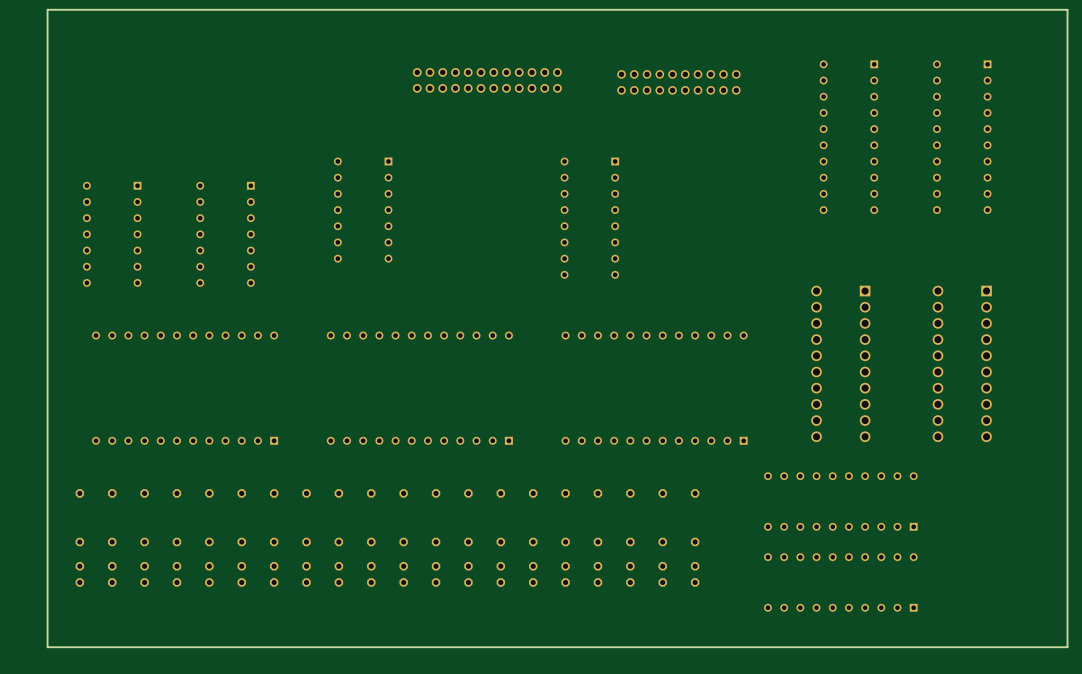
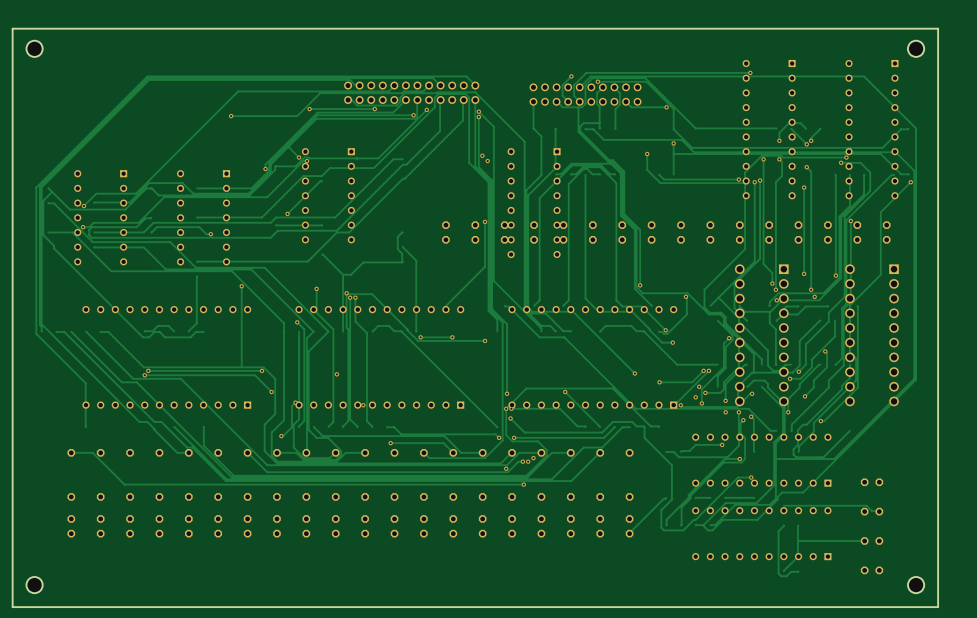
board edge: (1067, 9) (47, 9) (47, 647) (1067, 647) (1067, 9) -> (938, 28) (12, 28) (12, 607) (938, 607) (938, 28)
part: none -> (34, 48)
part: none -> (916, 48)
track: none -> (750, 72) (586, 72) (574, 85) (574, 95) (579, 101)
via: none -> (750, 72)
track: none -> (571, 76) (562, 85) (562, 95) (568, 101)
via: none -> (571, 76)
part position: (487, 80) -> (411, 92)
part position: (678, 82) -> (585, 94)
track: none -> (597, 81) (646, 81) (673, 109) (673, 129) (692, 147) (882, 147) (901, 129) (908, 128)
via: none -> (597, 81)
track: none -> (359, 85) (355, 85) (350, 79) (149, 79) (41, 187) (41, 324) (139, 421) (147, 421) (177, 452) (188, 452)
track: none -> (394, 85) (388, 91) (238, 91) (135, 193) (96, 193) (83, 206)
track: none -> (429, 85) (423, 91) (403, 91) (402, 93) (320, 93) (297, 116) (231, 116)
track: none -> (440, 85) (433, 78) (148, 78) (39, 186) (39, 325) (41, 331)
track: none -> (475, 85) (466, 76) (147, 76) (36, 187) (36, 333) (85, 383) (85, 427)
track: none -> (579, 87) (590, 76) (864, 76) (916, 128) (916, 379) (803, 492) (782, 492) (757, 519) (723, 519) (712, 530) (708, 530) (702, 525)
track: none -> (602, 87) (596, 93) (600, 128)
track: none -> (614, 87) (619, 93) (619, 104) (615, 109) (614, 128)
track: none -> (348, 100) (351, 100) (357, 105) (396, 105) (404, 93) (475, 92) (524, 141) (524, 309) (541, 325) (550, 325) (556, 331)
track: none -> (405, 100) (393, 112) (317, 112) (265, 164) (265, 169)
track: none -> (417, 100) (417, 116) (415, 118) (316, 118) (270, 164) (270, 171) (248, 193) (193, 193) (182, 183) (149, 183) (129, 202) (94, 203)
track: none -> (440, 100) (440, 131) (406, 164) (403, 164) (336, 230) (277, 230) (270, 237) (91, 237) (89, 235) (89, 229) (91, 227) (136, 227) (145, 218) (151, 217)
track: none -> (463, 100) (462, 120) (349, 232) (336, 232) (307, 261) (197, 261)
track: none -> (475, 100) (475, 166) (490, 181) (490, 310) (502, 322) (502, 440) (485, 458) (429, 458) (423, 452)
track: none -> (533, 101) (533, 128) (541, 136) (541, 175) (526, 190) (526, 308) (531, 313) (545, 313) (563, 331) (570, 331)
track: none -> (556, 101) (562, 107) (581, 107) (585, 103) (585, 85) (592, 78) (645, 78) (695, 128) (776, 128)
track: none -> (626, 101) (631, 107) (666, 107)
track: none -> (578, 107) (578, 131) (608, 161) (611, 161) (622, 172) (622, 214) (636, 228) (636, 287) (642, 293) (687, 293) (708, 314) (720, 314) (723, 317) (723, 324) (753, 354) (753, 372)
via: none -> (666, 107)
via: none -> (309, 109)
track: none -> (374, 109) (309, 109)
via: none -> (374, 109)
track: none -> (426, 109) (378, 158) (304, 157) (295, 166) (275, 166) (275, 169) (249, 195) (158, 195) (151, 188) (146, 188) (125, 209) (69, 209) (48, 188)
via: none -> (426, 109)
track: none -> (478, 111) (493, 126) (493, 280) (541, 328) (541, 331)
via: none -> (478, 111)
track: none -> (413, 115) (317, 115) (269, 163) (269, 170) (251, 188) (197, 188)
via: none -> (413, 115)
via: none -> (231, 116)
track: none -> (478, 116) (478, 167) (492, 180) (492, 309) (507, 324) (507, 393)
via: none -> (478, 116)
track: none -> (599, 123) (583, 123) (580, 126) (580, 131) (609, 160) (612, 160) (624, 171) (624, 213) (640, 229) (640, 285)
track: none -> (556, 128) (555, 168) (528, 195) (528, 307) (532, 311) (573, 311) (634, 373)
track: none -> (585, 128) (593, 129) (604, 139) (681, 139) (693, 152) (895, 152) (914, 170) (914, 378) (834, 459) (775, 459)
track: none -> (791, 128) (806, 144)
track: none -> (805, 128) (800, 123) (789, 123) (779, 132) (779, 140)
track: none -> (820, 128) (811, 138) (811, 140)
via: none -> (779, 140)
via: none -> (811, 140)
track: none -> (673, 143) (673, 174)
via: none -> (673, 143)
via: none -> (806, 144)
track: none -> (288, 146) (299, 157)
track: none -> (647, 154) (647, 169) (660, 183) (745, 183)
via: none -> (647, 154)
track: none -> (673, 154) (880, 154) (901, 174) (908, 174)
via: none -> (482, 155)
via: none -> (299, 157)
track: none -> (846, 157) (761, 155) (745, 172) (745, 249) (704, 289) (704, 307) (709, 312) (721, 312) (725, 317) (725, 323) (761, 359) (761, 364)
via: none -> (846, 157)
track: none -> (402, 159) (393, 159) (335, 217) (276, 217) (270, 222) (153, 222) (143, 232) (94, 232)
track: none -> (763, 159) (763, 264) (772, 273) (772, 283)
via: none -> (763, 159)
track: none -> (779, 159) (782, 161) (782, 176) (775, 182) (775, 289)
via: none -> (779, 159)
track: none -> (306, 161) (303, 161) (267, 197) (164, 197) (138, 222) (93, 222) (89, 227) (83, 227)
via: none -> (306, 161)
via: none -> (487, 161)
track: none -> (841, 162) (860, 162) (870, 172) (870, 191) (844, 216) (844, 296) (828, 312) (828, 321) (805, 344) (805, 364) (798, 371)
via: none -> (841, 162)
track: none -> (806, 167) (811, 171) (811, 289)
via: none -> (806, 167)
via: none -> (265, 169)
track: none -> (556, 174) (560, 174) (571, 163) (611, 163) (620, 173) (620, 215) (634, 229) (634, 288) (651, 305)
track: none -> (570, 174) (575, 174) (582, 167) (600, 167) (616, 183) (616, 300) (622, 306) (641, 306) (665, 330)
track: none -> (585, 174) (585, 298) (598, 311) (632, 311) (662, 342) (672, 342)
track: none -> (600, 174) (592, 174) (587, 169) (583, 169) (568, 183) (568, 300) (563, 305)
track: none -> (614, 174) (610, 174) (601, 165) (572, 165) (539, 198) (539, 300) (534, 305)
track: none -> (658, 174) (663, 179) (738, 179)
track: none -> (835, 174) (835, 275)
track: none -> (849, 174) (849, 206) (839, 216) (839, 277) (823, 293) (778, 293) (769, 302) (769, 305)
track: none -> (864, 174) (864, 194) (841, 217) (841, 278) (819, 300) (782, 300) (770, 311) (745, 311) (739, 305)
track: none -> (894, 174) (846, 220) (846, 303) (842, 308) (842, 358) (835, 364)
via: none -> (738, 179)
track: none -> (321, 181) (287, 213)
track: none -> (760, 180) (760, 258) (734, 284) (734, 308) (747, 320)
via: none -> (760, 180)
track: none -> (754, 182) (754, 261) (710, 305)
via: none -> (754, 182)
track: none -> (910, 182) (880, 212) (880, 274) (849, 305) (849, 352) (856, 358) (856, 380) (813, 422) (813, 431) (798, 446) (798, 451)
via: none -> (910, 182)
track: none -> (804, 187) (804, 273)
via: none -> (804, 187)
track: none -> (52, 191) (43, 200) (43, 235) (53, 245) (53, 248) (142, 337) (149, 337) (154, 332) (159, 331) (165, 337) (190, 337) (195, 332) (203, 331)
track: none -> (48, 203) (53, 203) (92, 242) (170, 242) (195, 267) (264, 267) (328, 331) (308, 351) (308, 429) (316, 437) (328, 437) (341, 451) (341, 454) (336, 459) (303, 459) (296, 452) (276, 452)
via: none -> (83, 206)
via: none -> (287, 213)
track: none -> (197, 217) (262, 217) (303, 176) (321, 176) (329, 168) (373, 168) (434, 107) (434, 97) (438, 94) (465, 94) (469, 97) (469, 162) (488, 182) (488, 310) (497, 319) (497, 331)
track: none -> (850, 221) (850, 302) (843, 309) (843, 365) (828, 380) (828, 387) (791, 424) (791, 430)
via: none -> (850, 221)
track: none -> (485, 221) (485, 266) (445, 305)
via: none -> (485, 221)
track: none -> (321, 225) (276, 225)
via: none -> (83, 227)
track: none -> (48, 232) (72, 232) (111, 271) (232, 271) (284, 323) (284, 420) (271, 432) (271, 455) (277, 461) (336, 461) (345, 452) (365, 452)
track: none -> (151, 232) (157, 227) (199, 227) (206, 234) (210, 234)
track: none -> (402, 232) (397, 236) (397, 249) (402, 253) (402, 262) (363, 262) (351, 274) (343, 274)
part: none -> (445, 232)
part: none -> (475, 232)
part: none -> (504, 232)
part: none -> (534, 232)
part: none -> (563, 232)
part: none -> (592, 232)
part: none -> (622, 232)
part: none -> (651, 232)
part: none -> (681, 232)
part: none -> (710, 232)
part: none -> (739, 232)
part: none -> (769, 232)
part: none -> (798, 232)
part: none -> (827, 232)
part: none -> (857, 232)
part: none -> (886, 232)
via: none -> (210, 234)
track: none -> (94, 247) (143, 247) (165, 269) (251, 269) (313, 331) (306, 338) (306, 452)
track: none -> (402, 247) (416, 260) (416, 331)
track: none -> (321, 254) (343, 274)
via: none -> (804, 273)
track: none -> (343, 274) (343, 331)
via: none -> (835, 275)
track: none -> (197, 276) (196, 323) (188, 331)
via: none -> (772, 283)
via: none -> (640, 285)
track: none -> (241, 286) (241, 367)
via: none -> (241, 286)
track: none -> (316, 288) (316, 312) (333, 329) (333, 421) (328, 427)
via: none -> (316, 288)
via: none -> (775, 289)
via: none -> (811, 289)
track: none -> (346, 293) (348, 421) (343, 427)
via: none -> (346, 293)
track: none -> (346, 294) (372, 294) (418, 340) (485, 340)
track: none -> (686, 296) (686, 314) (667, 333) (658, 331)
via: none -> (686, 296)
via: none -> (814, 296)
track: none -> (350, 297) (350, 419) (357, 427)
via: none -> (350, 297)
track: none -> (355, 297) (355, 321) (366, 332) (366, 421) (372, 427)
via: none -> (355, 297)
track: none -> (718, 297) (767, 350) (767, 365) (773, 370) (779, 370) (785, 364) (791, 364)
via: none -> (776, 300)
track: none -> (504, 305) (508, 306) (539, 337) (564, 337) (635, 408) (748, 408) (770, 430) (776, 430)
track: none -> (798, 305) (786, 306) (782, 310)
track: none -> (827, 305) (805, 306) (797, 314) (782, 314) (776, 320)
track: none -> (857, 305) (857, 387) (824, 421) (820, 421)
track: none -> (769, 311) (769, 323) (775, 329) (776, 364)
track: none -> (717, 320) (732, 335) (732, 340) (725, 347) (725, 368) (717, 376) (717, 386)
track: none -> (820, 320) (799, 340) (799, 365) (792, 372) (752, 372) (740, 384) (738, 390) (738, 400)
track: none -> (835, 320) (834, 336) (812, 359) (812, 367) (800, 378) (790, 378)
track: none -> (297, 322) (304, 329) (304, 421) (299, 427)
via: none -> (297, 322)
via: none -> (665, 330)
track: none -> (56, 331) (64, 332) (154, 421) (161, 421) (187, 447) (192, 447) (225, 481) (571, 481) (600, 452)
track: none -> (71, 331) (121, 382) (136, 382) (232, 477) (527, 477) (552, 452) (570, 452)
track: none -> (85, 331) (133, 378) (180, 378) (267, 465) (507, 465) (519, 452) (541, 452)
track: none -> (100, 331) (108, 332) (143, 367) (263, 367) (275, 378) (275, 414) (264, 424) (264, 451) (276, 463) (500, 463) (512, 452)
track: none -> (174, 331) (168, 325) (157, 325) (152, 331) (144, 331)
track: none -> (299, 331) (299, 419) (293, 424) (293, 447) (304, 458) (329, 458) (335, 452)
track: none -> (372, 331) (378, 325) (388, 325) (394, 331) (401, 331) (497, 427)
track: none -> (600, 331) (605, 325) (631, 325) (636, 331) (644, 331) (677, 364) (717, 364)
via: none -> (420, 337)
track: none -> (452, 337) (420, 337)
via: none -> (452, 337)
track: none -> (729, 338) (723, 343) (723, 367) (701, 389) (701, 403)
via: none -> (729, 338)
via: none -> (485, 340)
via: none -> (672, 342)
track: none -> (738, 344) (738, 367) (723, 382) (723, 389) (720, 392) (705, 392)
track: none -> (825, 351) (827, 353) (827, 367) (813, 380) (813, 387) (805, 396)
via: none -> (825, 351)
track: none -> (747, 364) (725, 384) (725, 400)
track: none -> (820, 364) (799, 384) (799, 387) (788, 399) (788, 412)
track: none -> (849, 364) (849, 377) (842, 385) (842, 389) (806, 424) (803, 424) (797, 429) (797, 444) (793, 449) (793, 454) (796, 457) (823, 457) (849, 430)
via: none -> (148, 370)
track: none -> (262, 370) (148, 370)
via: none -> (262, 370)
track: none -> (703, 370) (692, 382) (659, 382)
via: none -> (703, 370)
track: none -> (708, 370) (674, 405)
via: none -> (708, 370)
via: none -> (798, 371)
via: none -> (634, 373)
via: none -> (336, 374)
track: none -> (144, 375) (254, 375) (271, 392)
via: none -> (144, 375)
via: none -> (790, 378)
via: none -> (659, 382)
via: none -> (699, 386)
track: none -> (747, 386) (753, 380) (764, 380) (767, 384) (767, 387) (784, 404) (784, 434) (775, 443) (775, 498) (769, 504) (735, 504) (715, 525) (710, 525)
track: none -> (761, 386) (782, 407) (782, 433) (774, 442) (774, 485) (756, 503) (725, 503) (703, 525) (695, 525)
via: none -> (271, 392)
track: none -> (565, 392) (600, 427)
via: none -> (565, 392)
via: none -> (705, 392)
via: none -> (507, 393)
track: none -> (752, 393) (737, 407) (682, 407) (680, 405)
via: none -> (752, 393)
via: none -> (805, 396)
via: none -> (695, 397)
via: none -> (725, 400)
track: none -> (295, 402) (291, 406) (291, 427) (281, 436)
via: none -> (295, 402)
via: none -> (701, 403)
via: none -> (363, 405)
via: none -> (680, 405)
via: none -> (506, 408)
track: none -> (511, 408) (559, 408) (577, 426) (585, 427)
via: none -> (511, 408)
via: none -> (725, 412)
track: none -> (738, 412) (738, 445) (727, 457) (678, 457) (673, 451) (666, 451)
via: none -> (738, 412)
via: none -> (788, 412)
track: none -> (751, 416) (753, 419) (754, 451)
via: none -> (751, 416)
track: none -> (510, 418) (524, 432) (602, 432) (612, 421) (632, 421) (636, 426) (643, 426) (644, 437) (671, 465) (671, 499) (661, 510) (661, 527) (663, 530) (683, 530) (738, 477) (751, 477)
via: none -> (510, 418)
track: none -> (743, 420) (740, 422) (740, 433) (745, 437) (745, 459) (741, 462) (723, 462) (690, 496) (690, 498) (681, 507) (681, 525)
via: none -> (743, 420)
via: none -> (820, 421)
track: none -> (313, 427) (322, 436) (444, 436) (461, 452) (482, 452)
track: none -> (387, 427) (394, 427) (401, 434) (495, 434) (499, 437)
track: none -> (614, 427) (604, 437) (514, 437)
track: none -> (629, 427) (622, 427) (602, 447) (583, 447) (552, 479) (226, 479) (174, 427)
track: none -> (658, 427) (650, 426) (612, 388) (526, 388) (506, 408) (506, 435) (512, 441) (537, 441) (546, 450) (546, 455) (526, 475) (233, 475) (203, 445) (203, 427)
via: none -> (281, 436)
via: none -> (499, 437)
via: none -> (514, 437)
track: none -> (390, 443) (443, 443) (453, 452)
via: none -> (390, 443)
track: none -> (722, 444) (695, 444) (689, 451) (681, 451)
via: none -> (722, 444)
track: none -> (71, 452) (92, 452) (124, 484) (523, 484)
track: none -> (247, 452) (267, 472) (507, 472) (518, 461) (522, 461)
via: none -> (533, 458)
track: none -> (739, 459) (724, 459) (666, 519) (666, 525)
via: none -> (739, 459)
via: none -> (522, 461)
via: none -> (528, 461)
via: none -> (506, 468)
via: none -> (751, 477)
part: none -> (872, 482)
via: none -> (523, 484)
track: none -> (695, 497) (710, 497)
track: none -> (666, 497) (629, 533)
track: none -> (754, 497) (725, 497)
track: none -> (783, 505) (866, 505) (872, 511) (879, 511)
part: none -> (872, 511)
track: none -> (783, 525) (778, 531) (778, 573) (781, 576) (786, 576) (790, 571) (798, 571)
track: none -> (798, 525) (797, 556) (783, 571)
track: none -> (864, 541) (797, 541)
part: none -> (872, 541)
part: none -> (872, 570)
part: none -> (34, 585)
part: none -> (916, 585)

